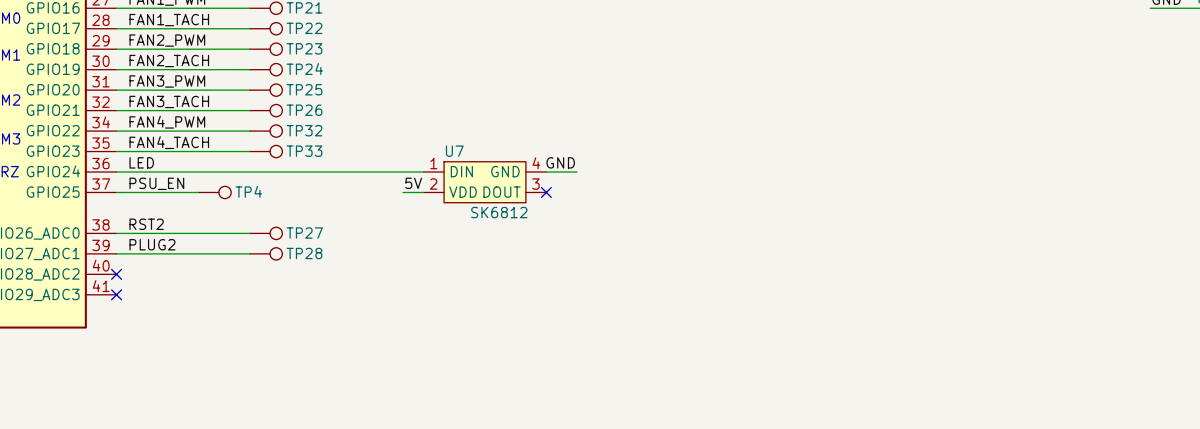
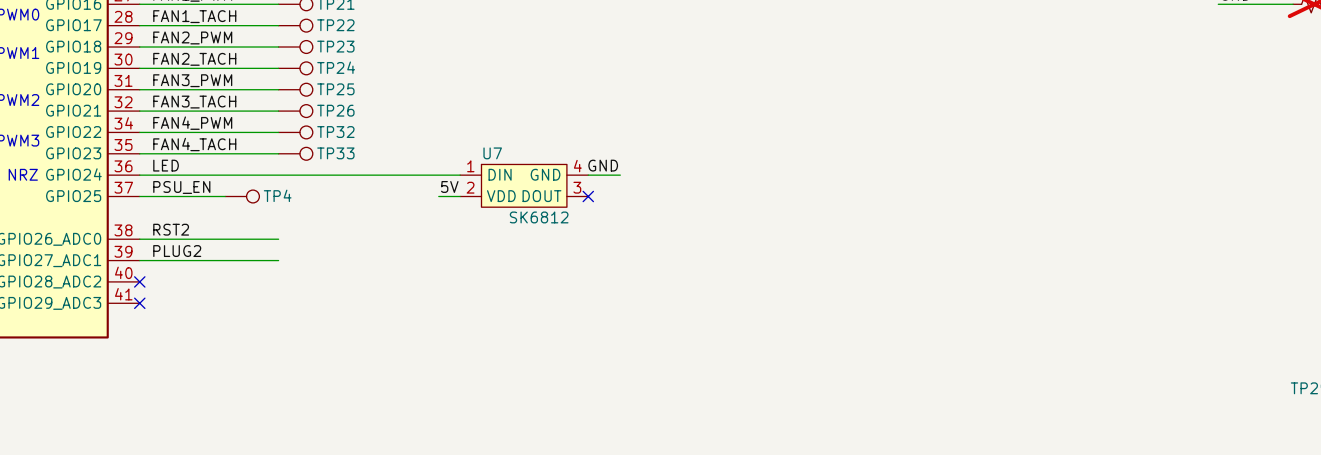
TP27: (265, 233) -> none
TP28: (265, 253) -> none

